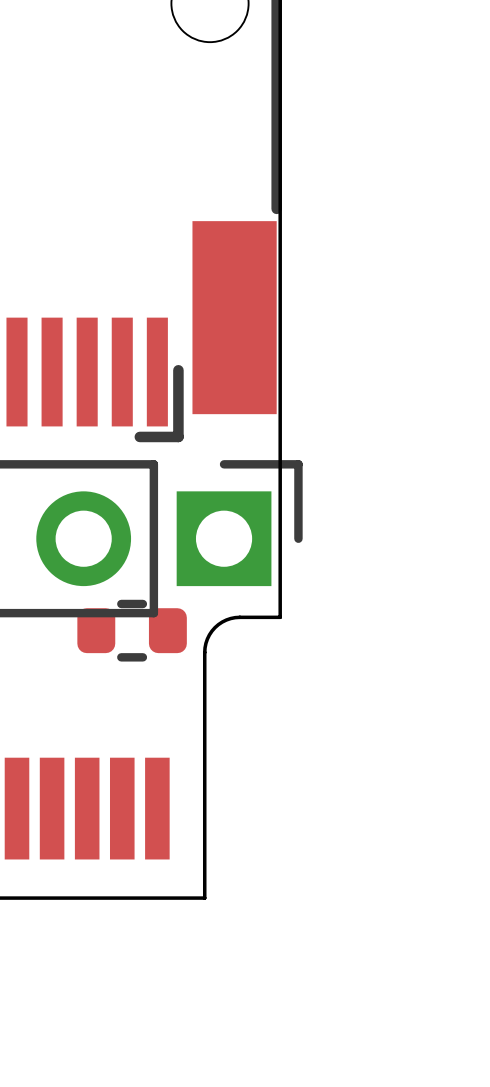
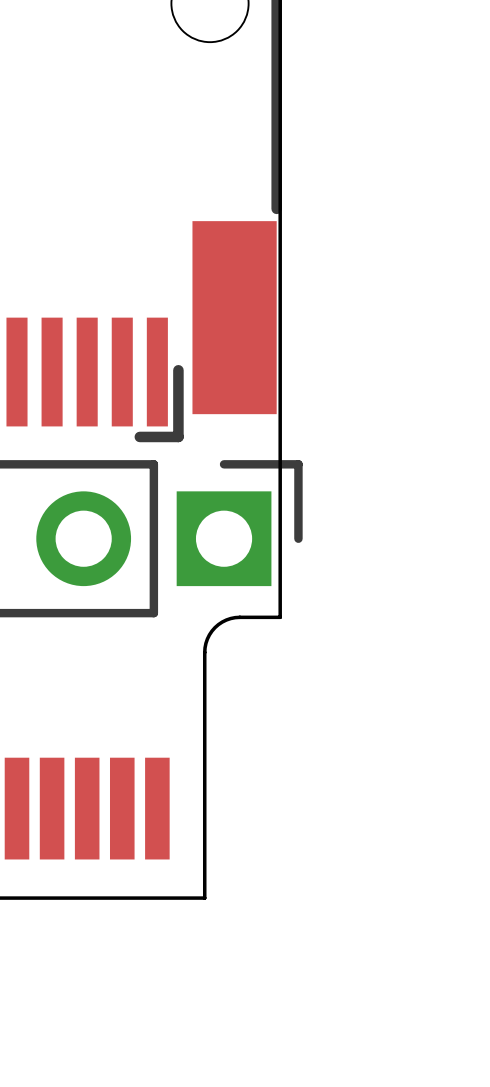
part: (132, 630) -> none

